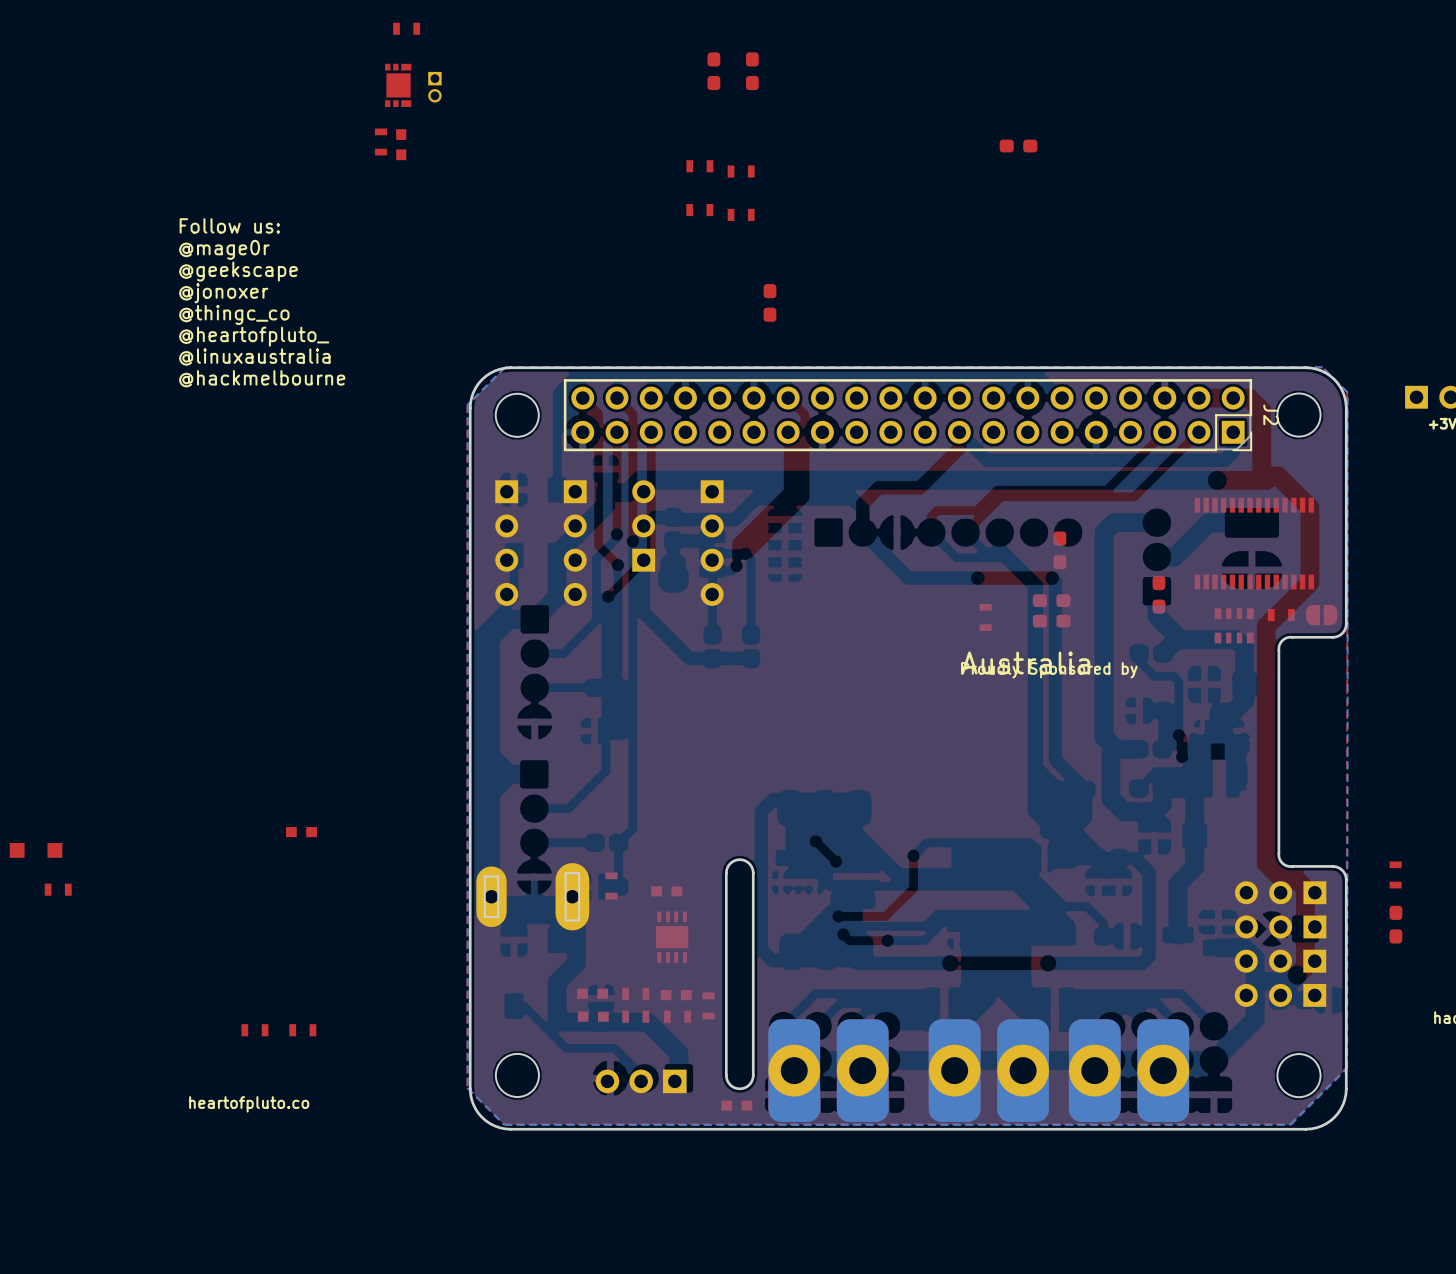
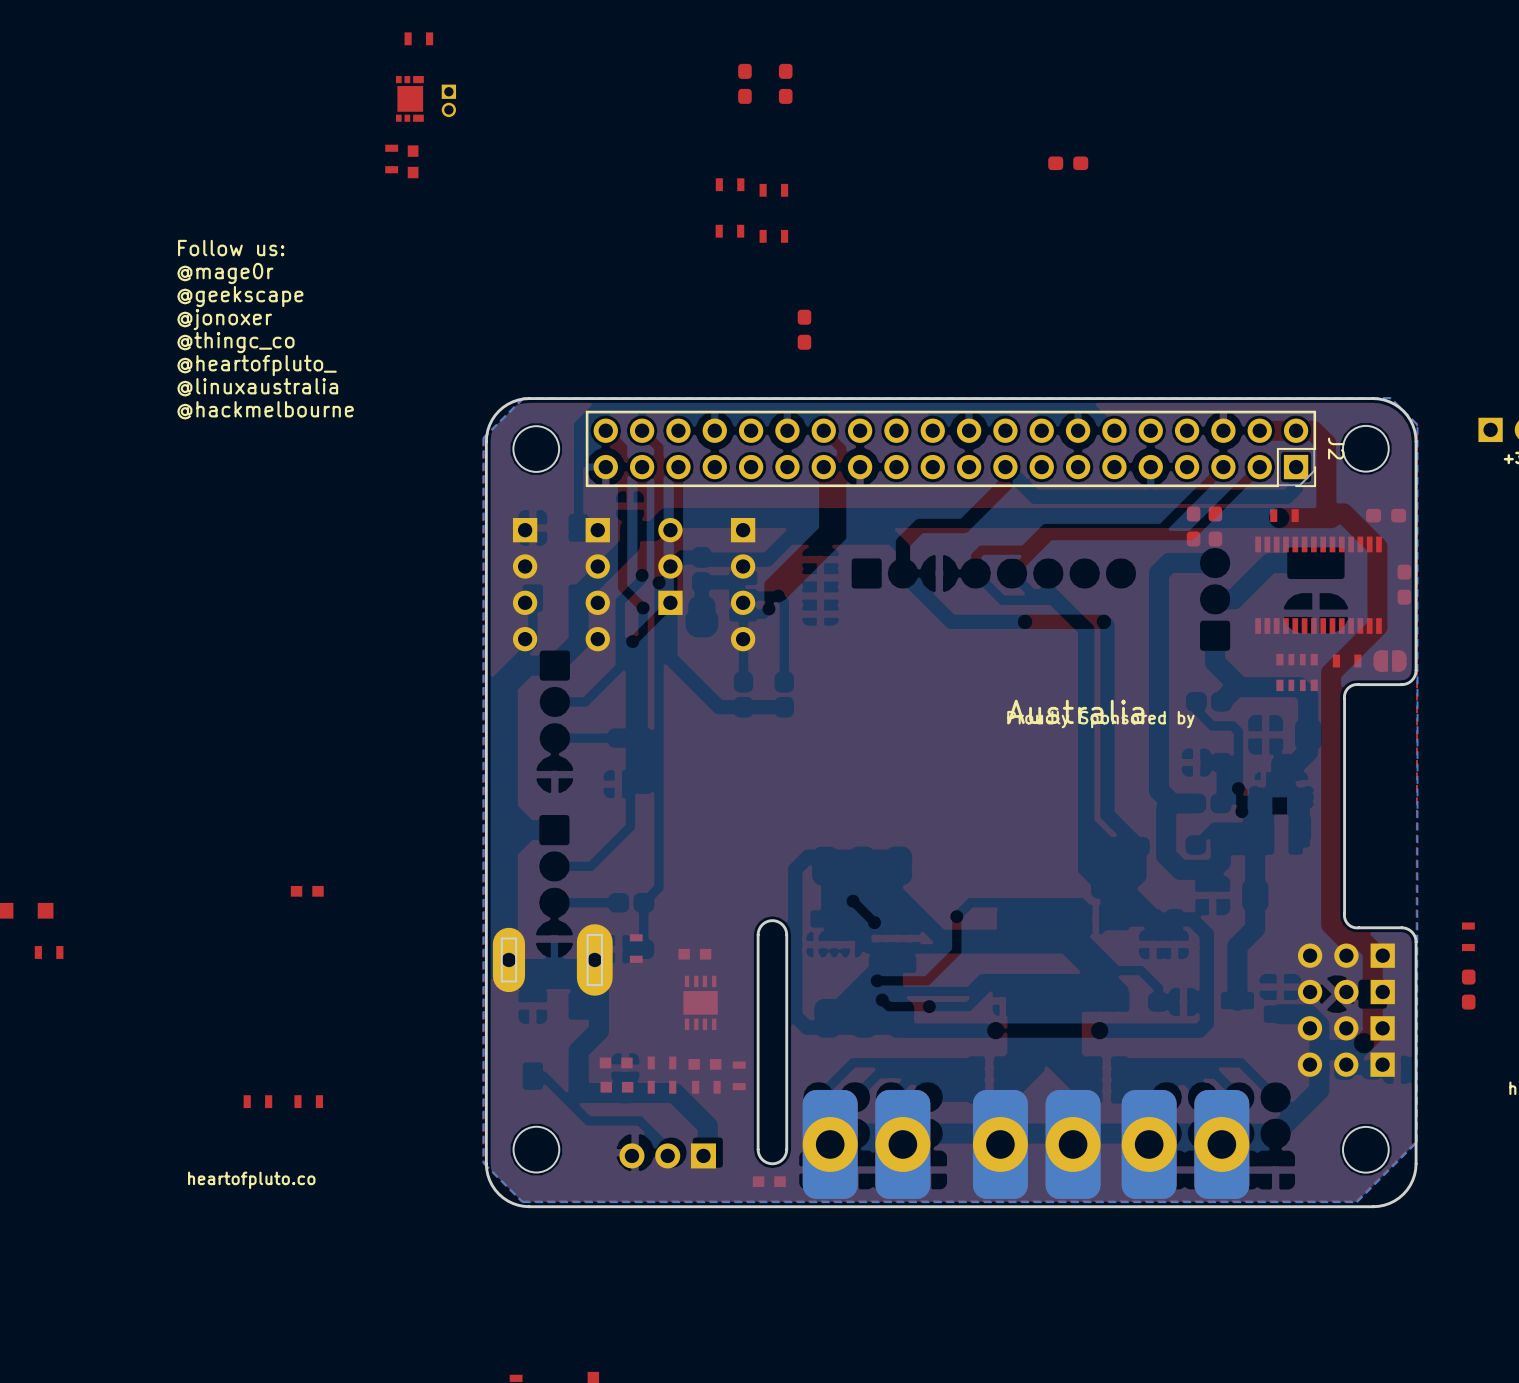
part: none -> (1386, 515)
part: none -> (1193, 526)
part: none -> (1215, 526)
part: none -> (1404, 584)
part: (1059, 550) -> none
part: (1158, 594) -> none
part: (1051, 600) -> none
part rotation: 0° (985, 617) -> 90° clockwise (1284, 515)
part position: (985, 617) -> (1284, 515)
part: (1051, 621) -> none

